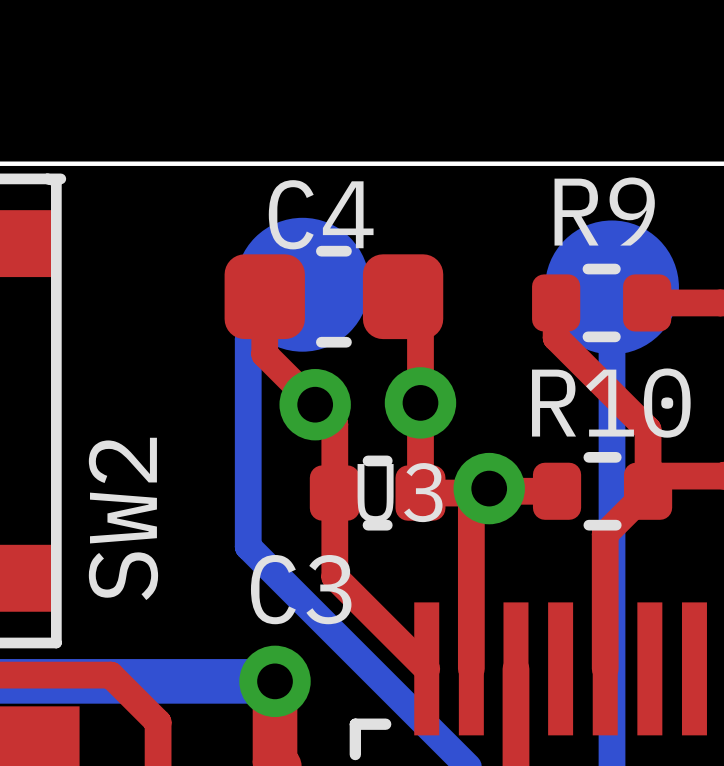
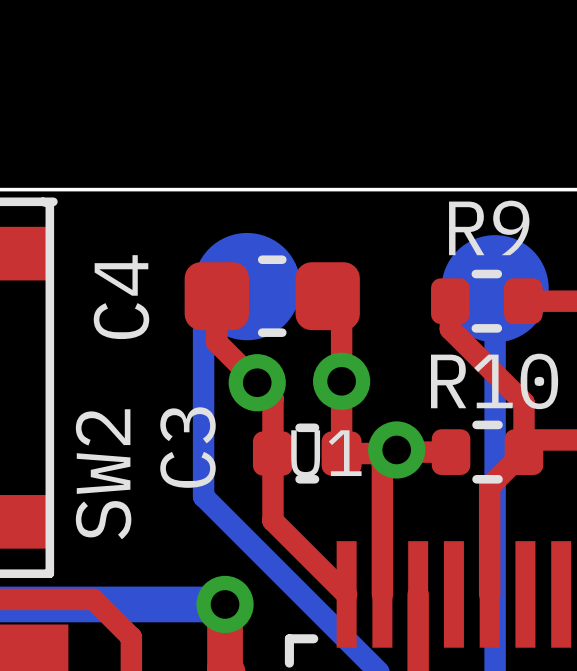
C4 name rotation: 0° (321, 214) -> 90° counterclockwise (121, 297)
C4 name position: C4 (321, 214) -> C4 (121, 297)
U3 name: U3 (400, 492) -> U1 (326, 453)
C3 name rotation: 0° (301, 589) -> 90° counterclockwise (187, 447)

